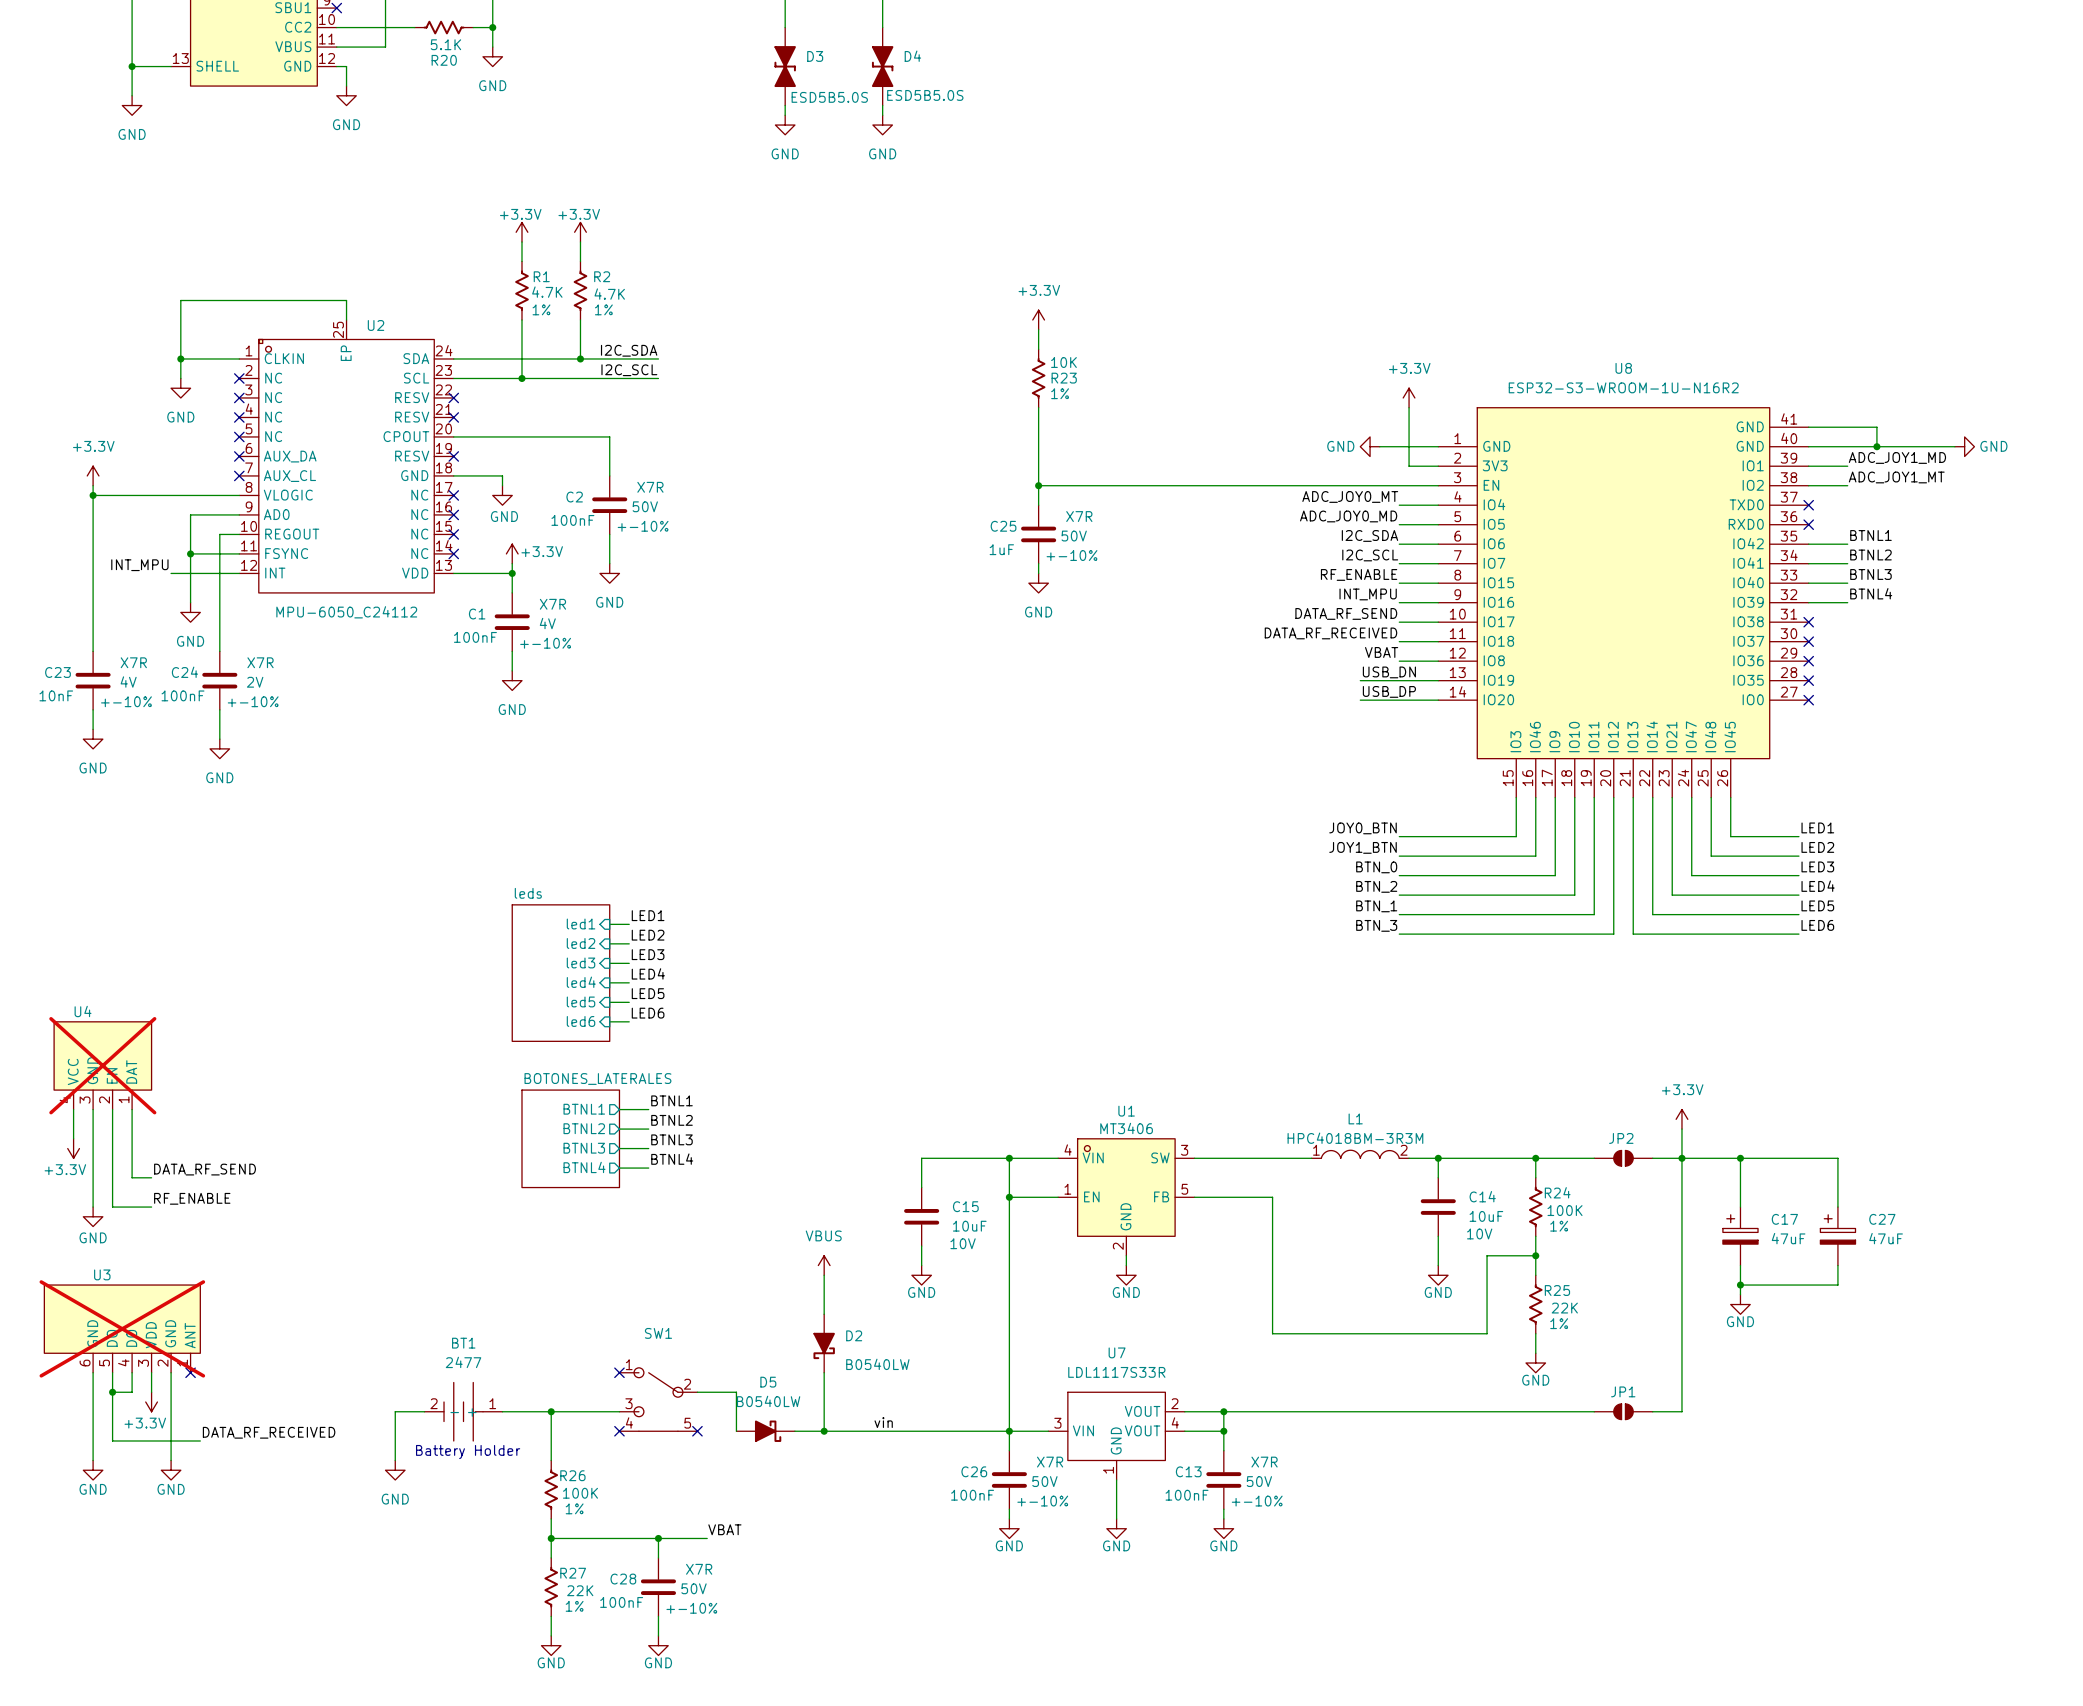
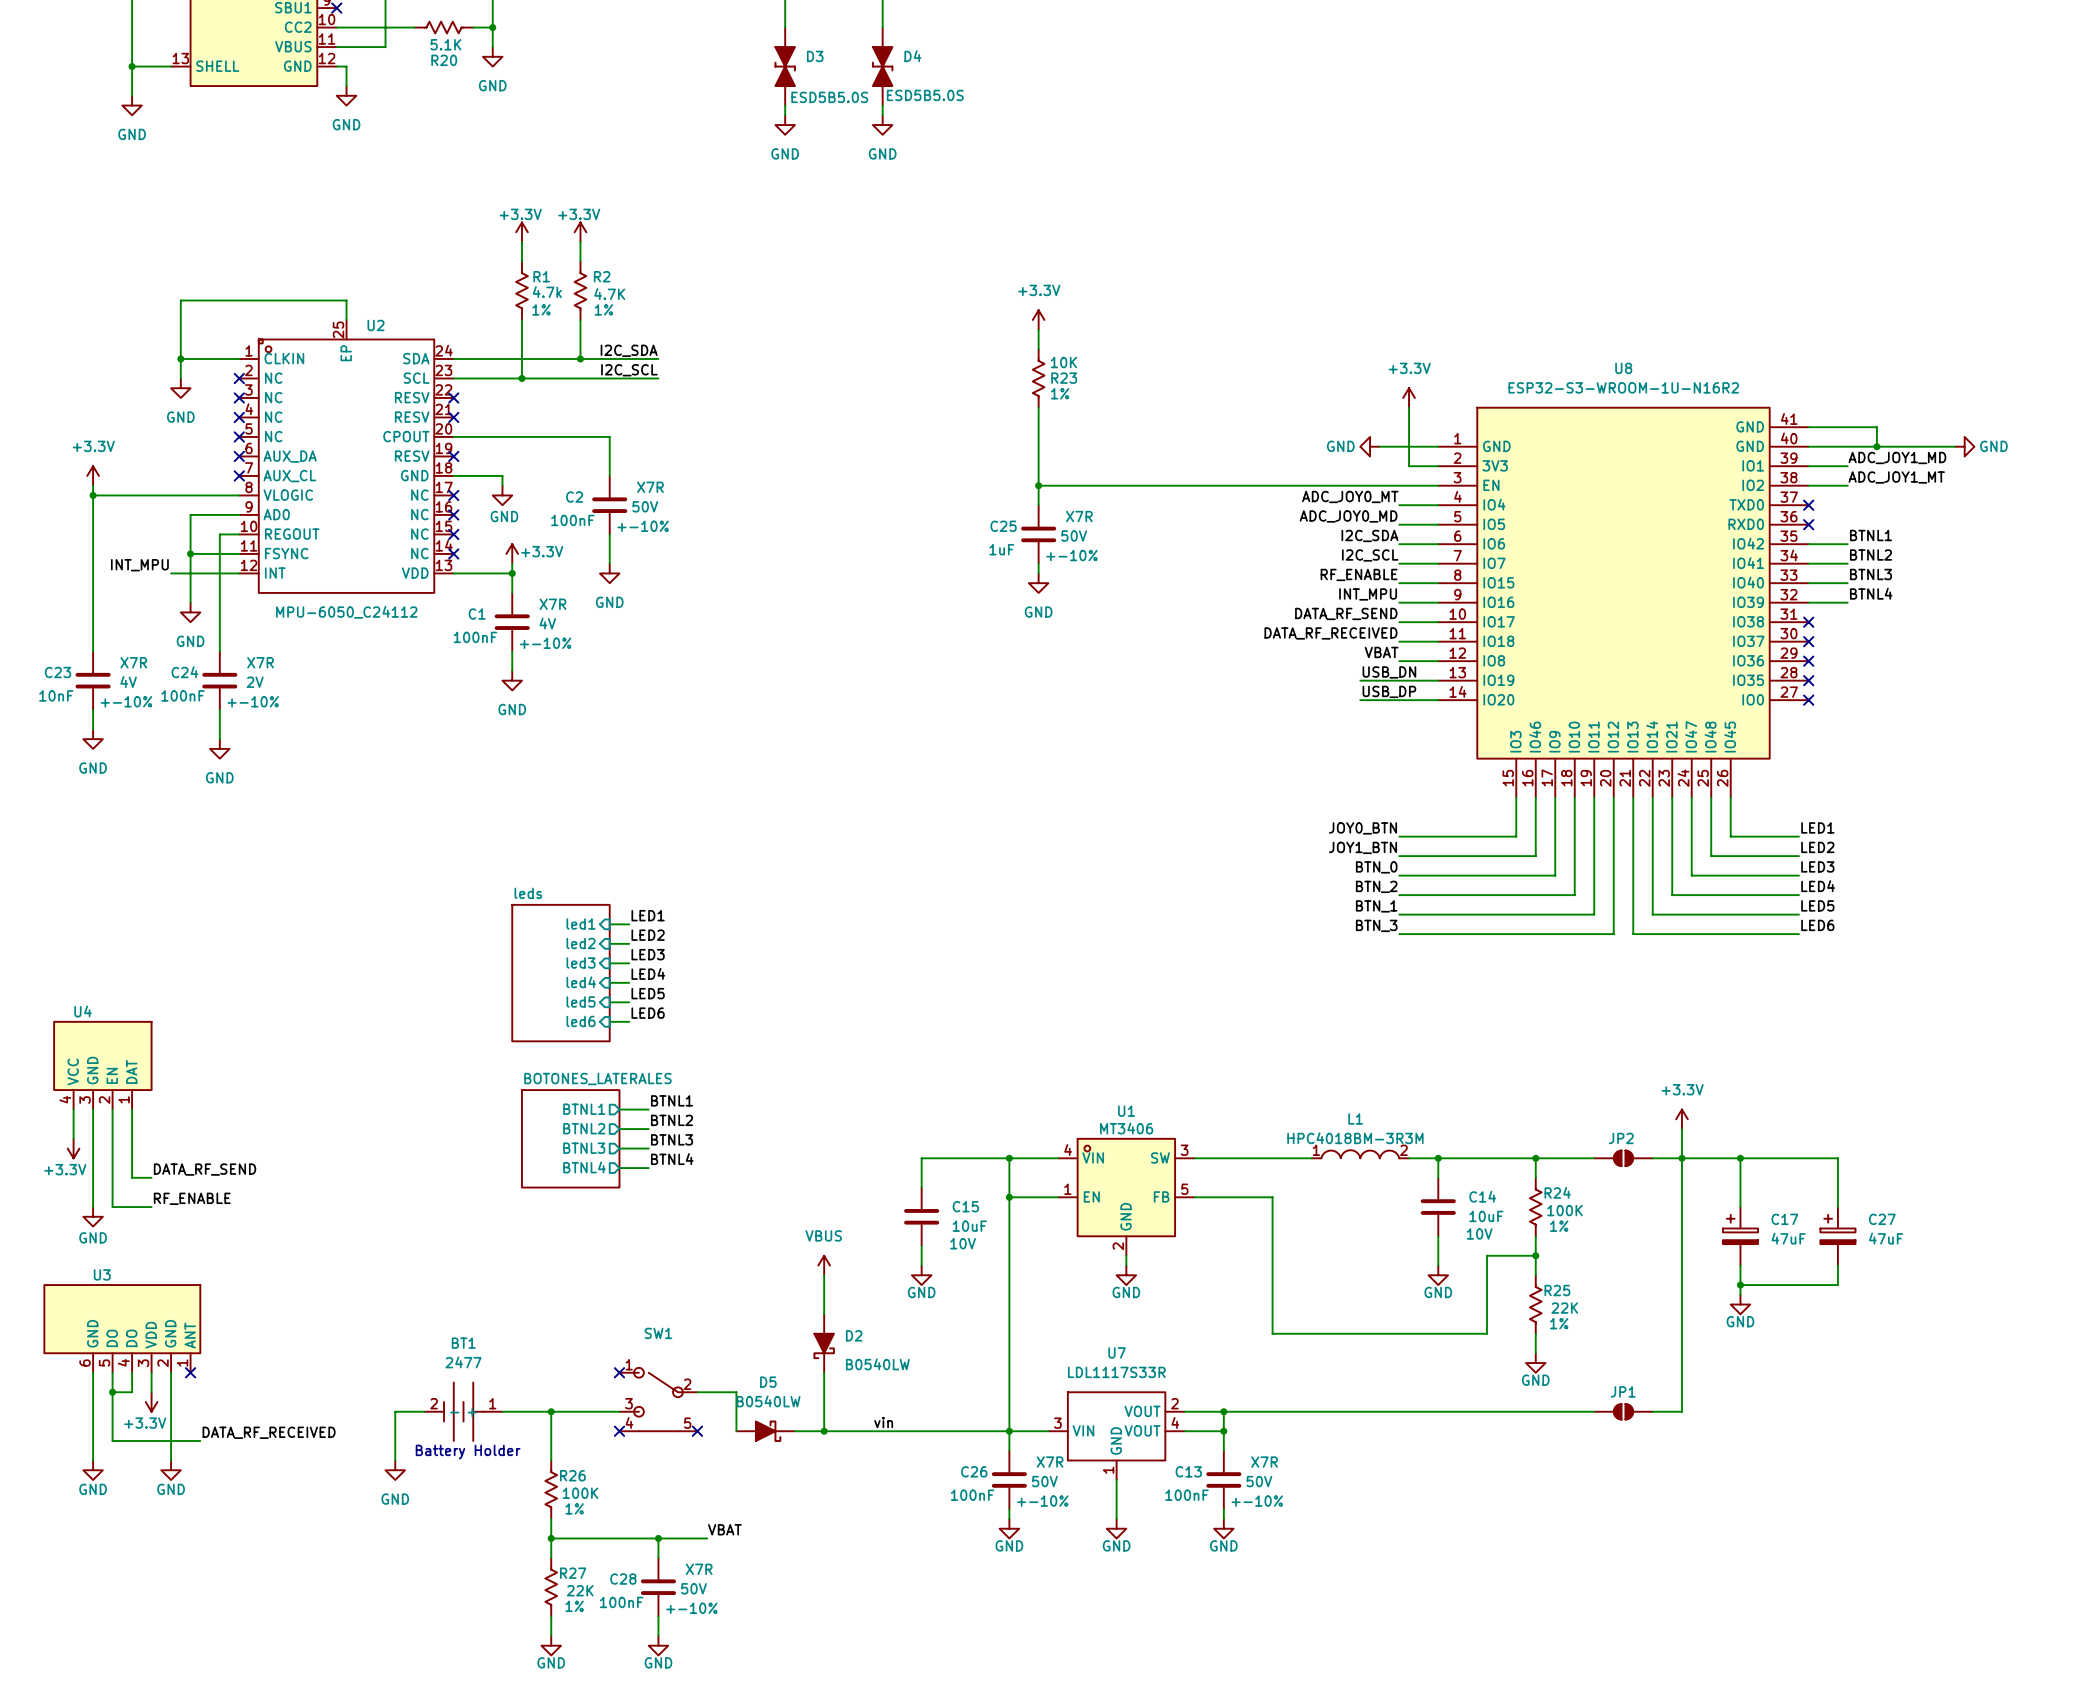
R1 value: 4.7K (547, 292) -> 4.7k (547, 292)
U4 do-not-place cross: (102, 1065) -> none
U3 do-not-place cross: (122, 1328) -> none

